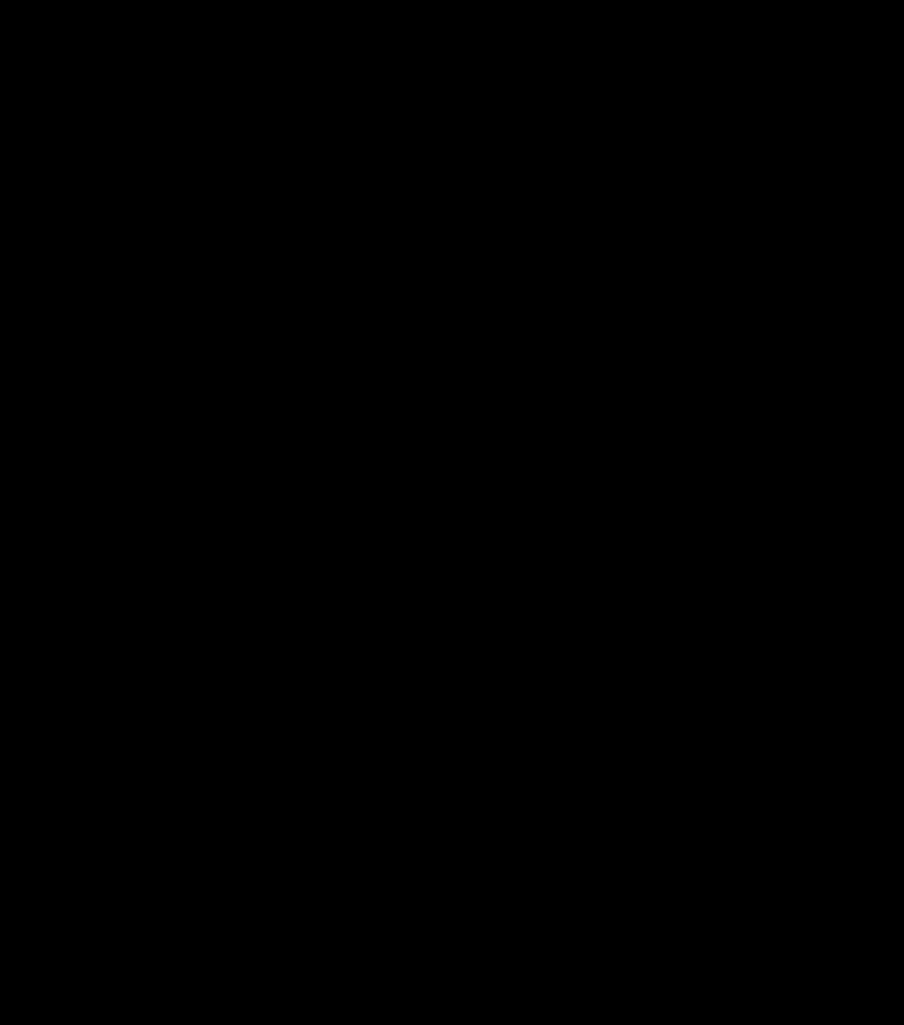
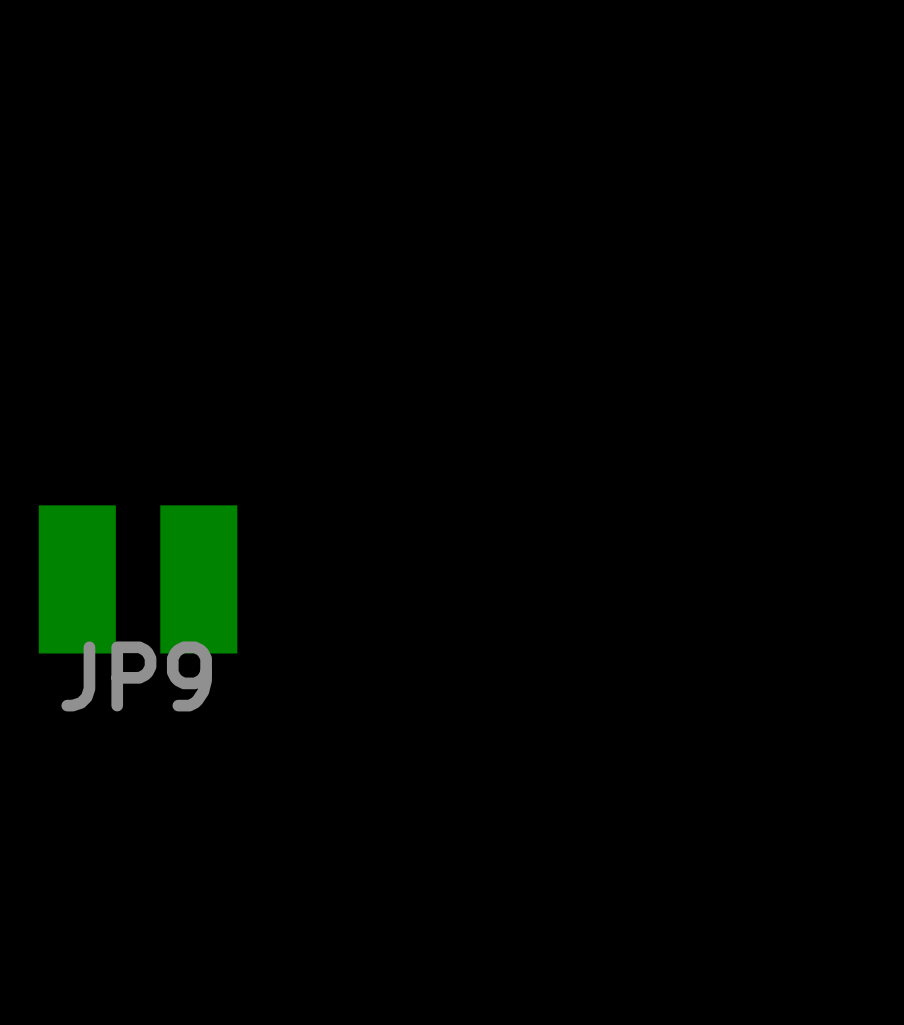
JP9: none -> (138, 579)

